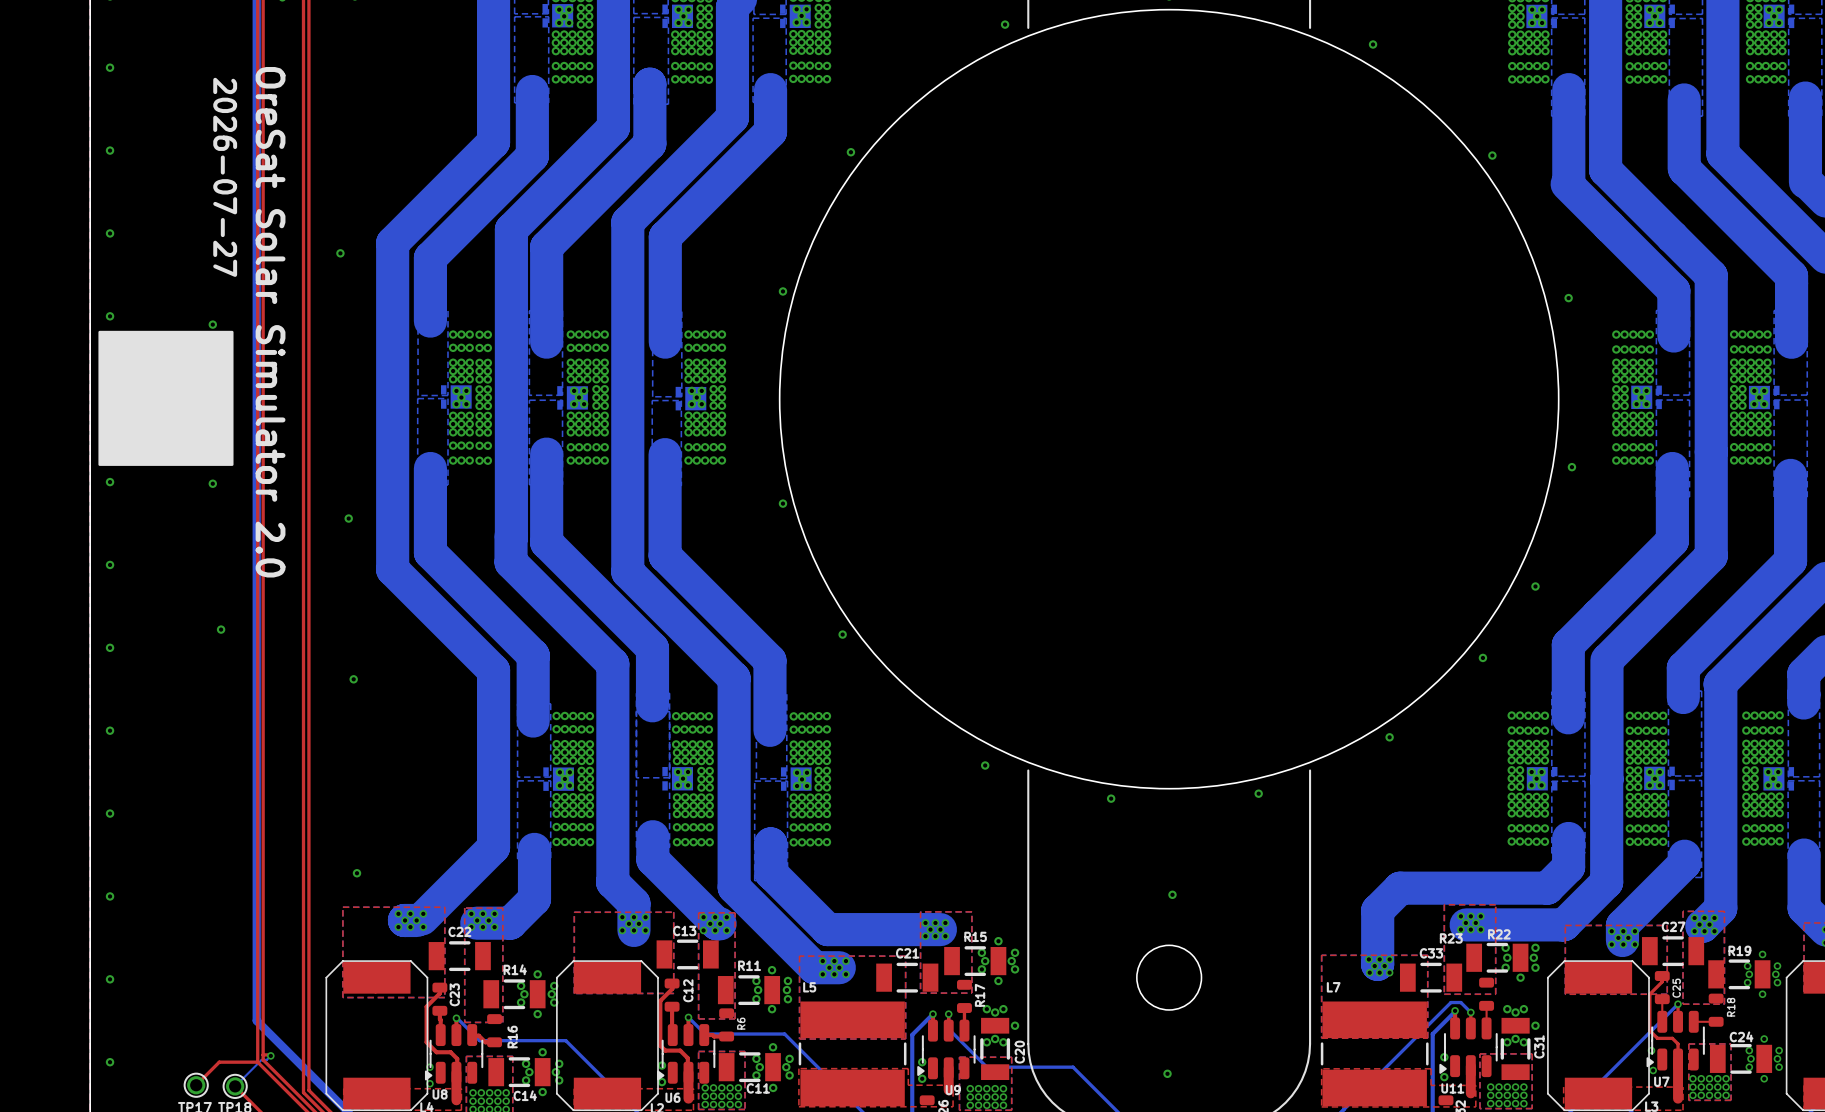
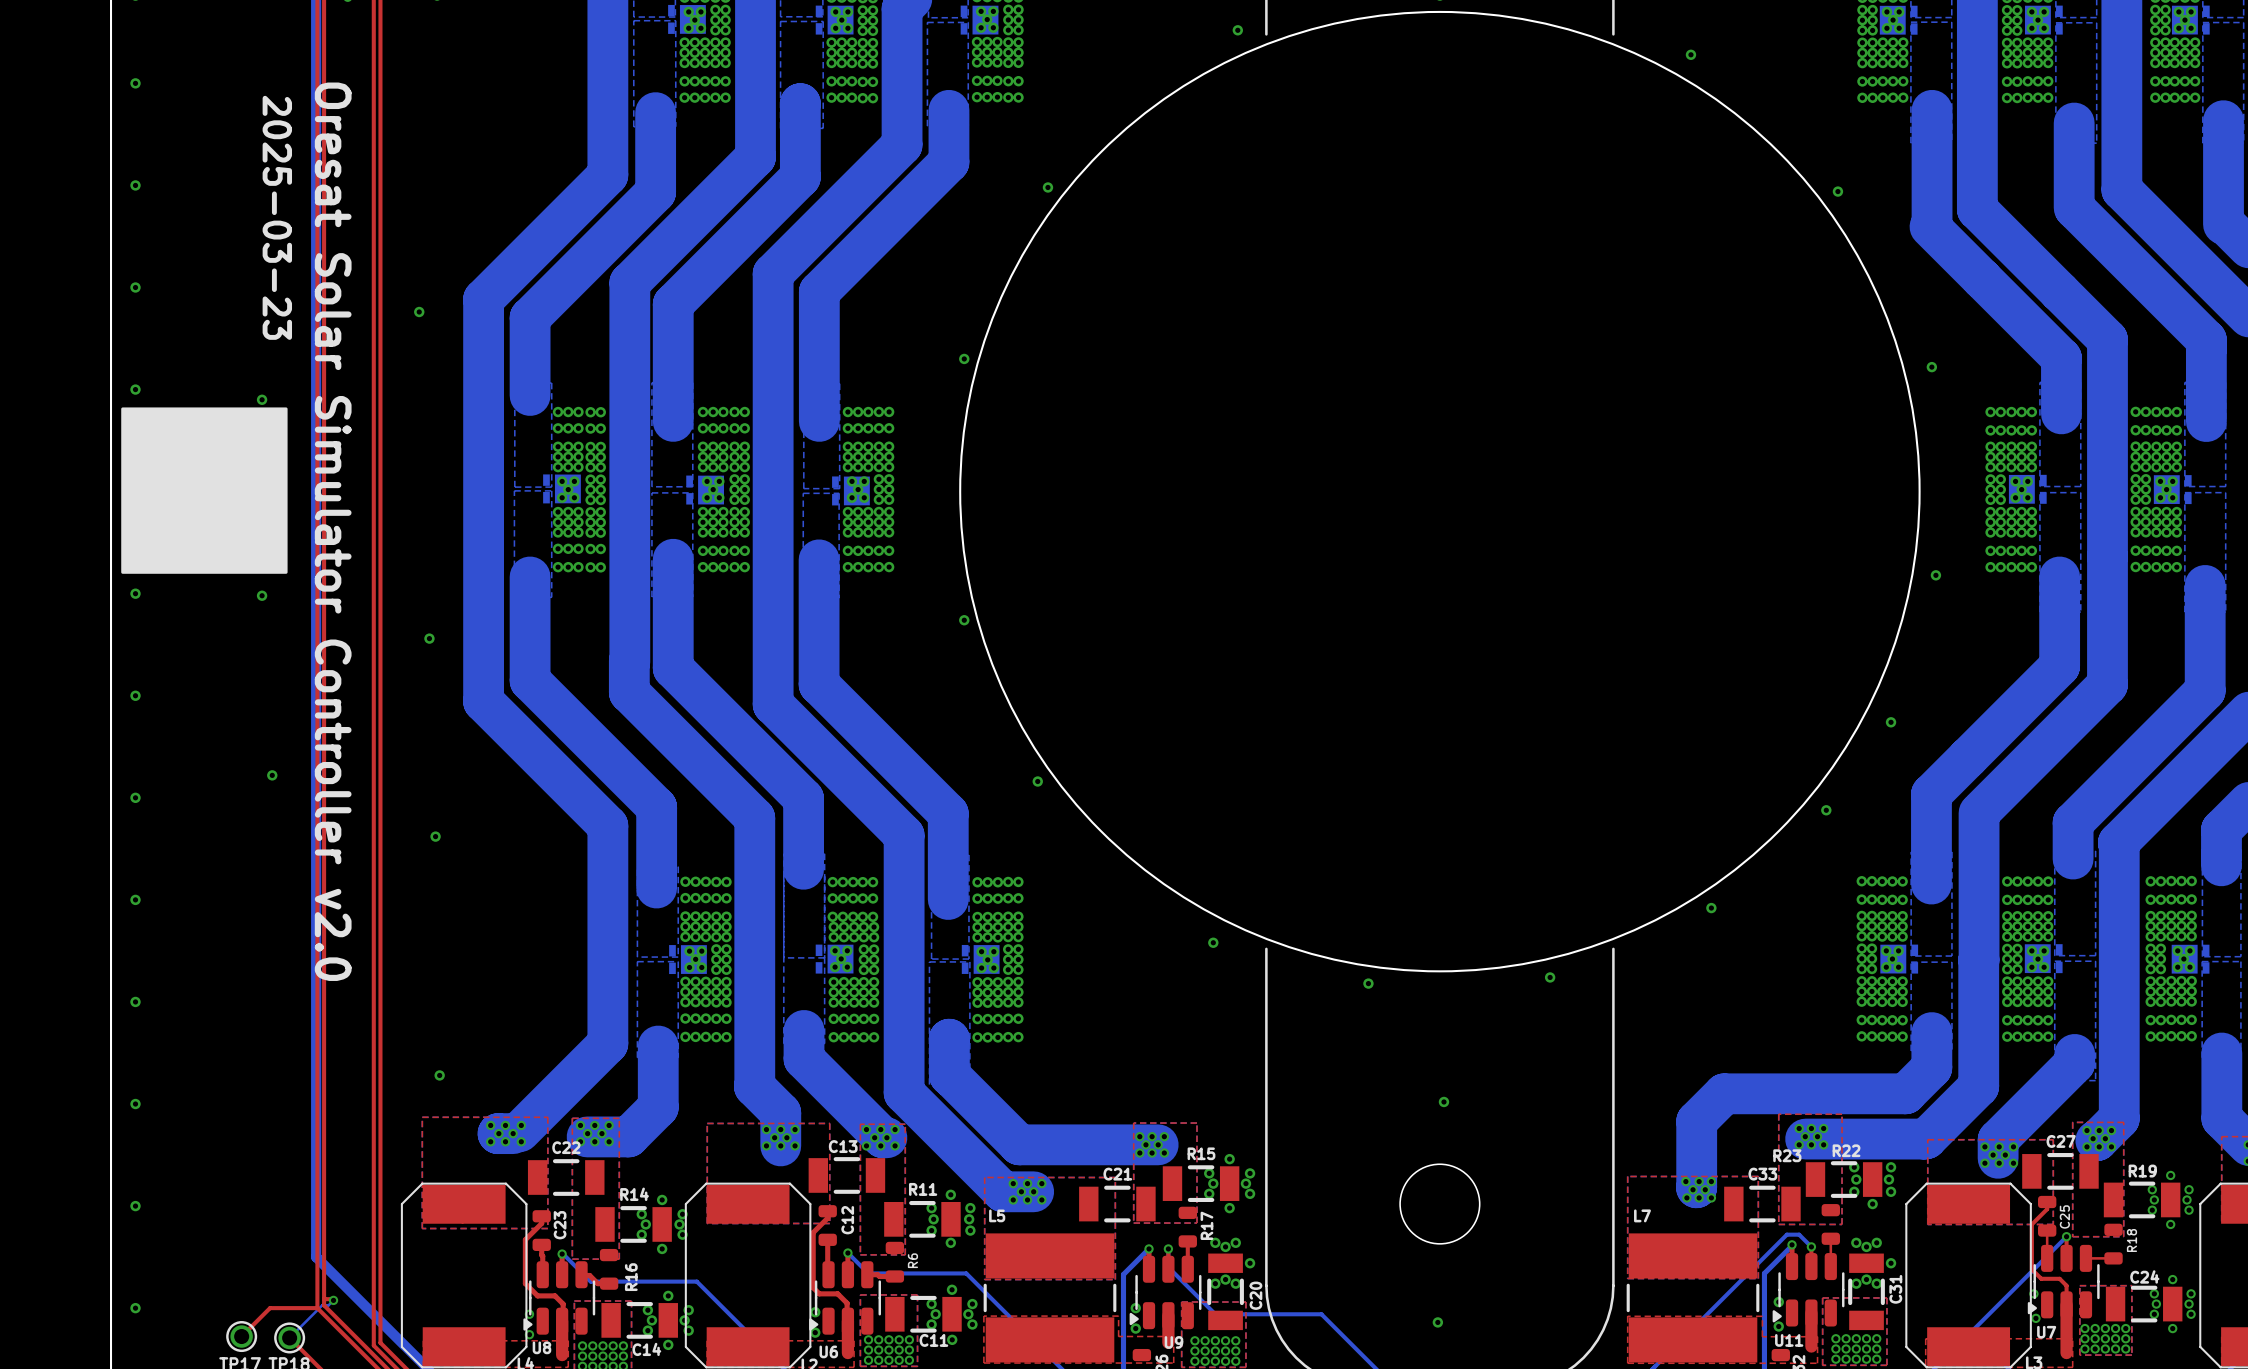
text: 2026-07-27 (225, 177) -> 2025-03-23 (277, 217)
text: OreSat Solar Simulator 2.0 (270, 322) -> Oresat Solar Simulator Controller v2.0 (333, 531)

